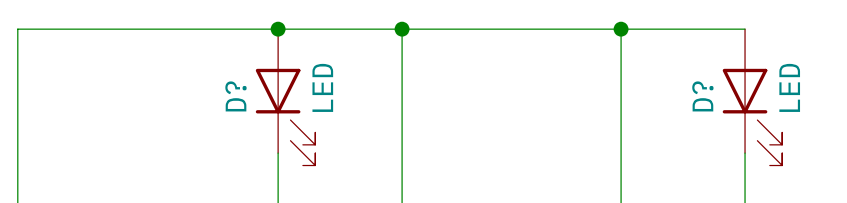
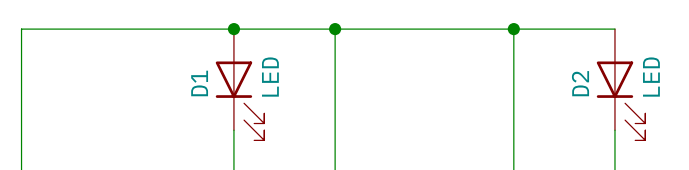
D? name: D? (235, 96) -> D1 (199, 83)
D? name: D? (702, 96) -> D2 (580, 83)

